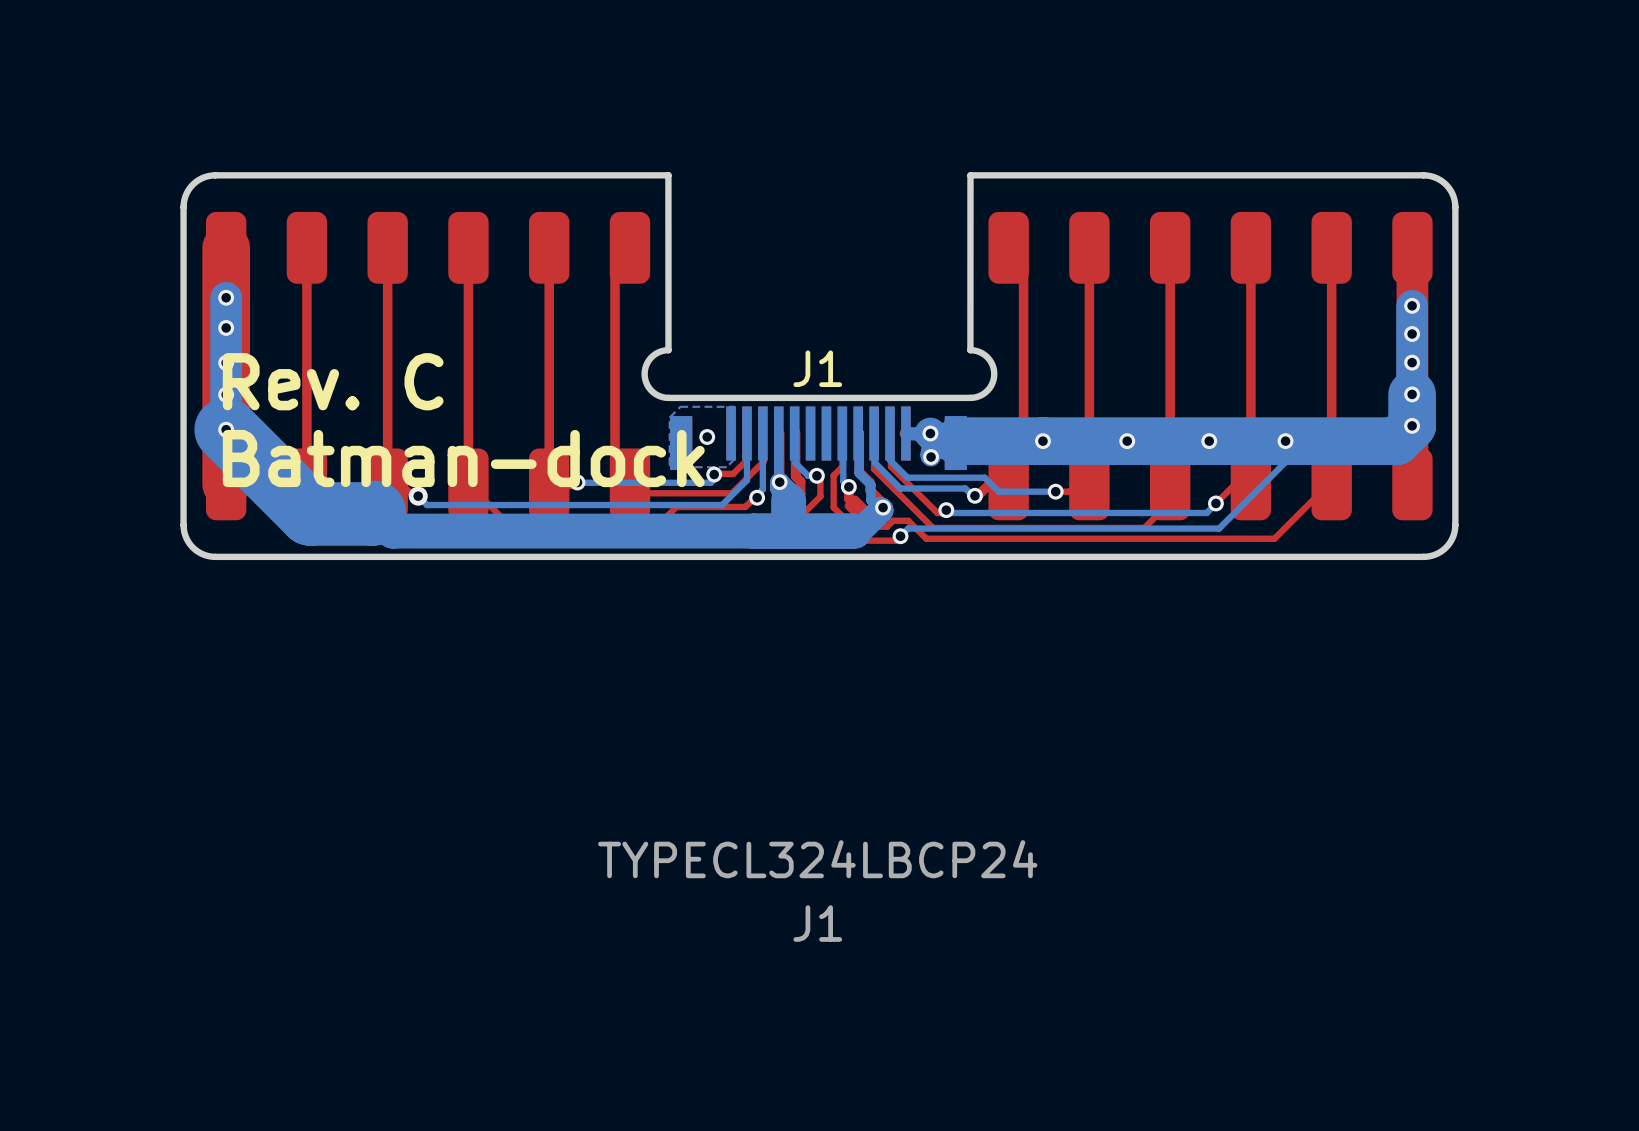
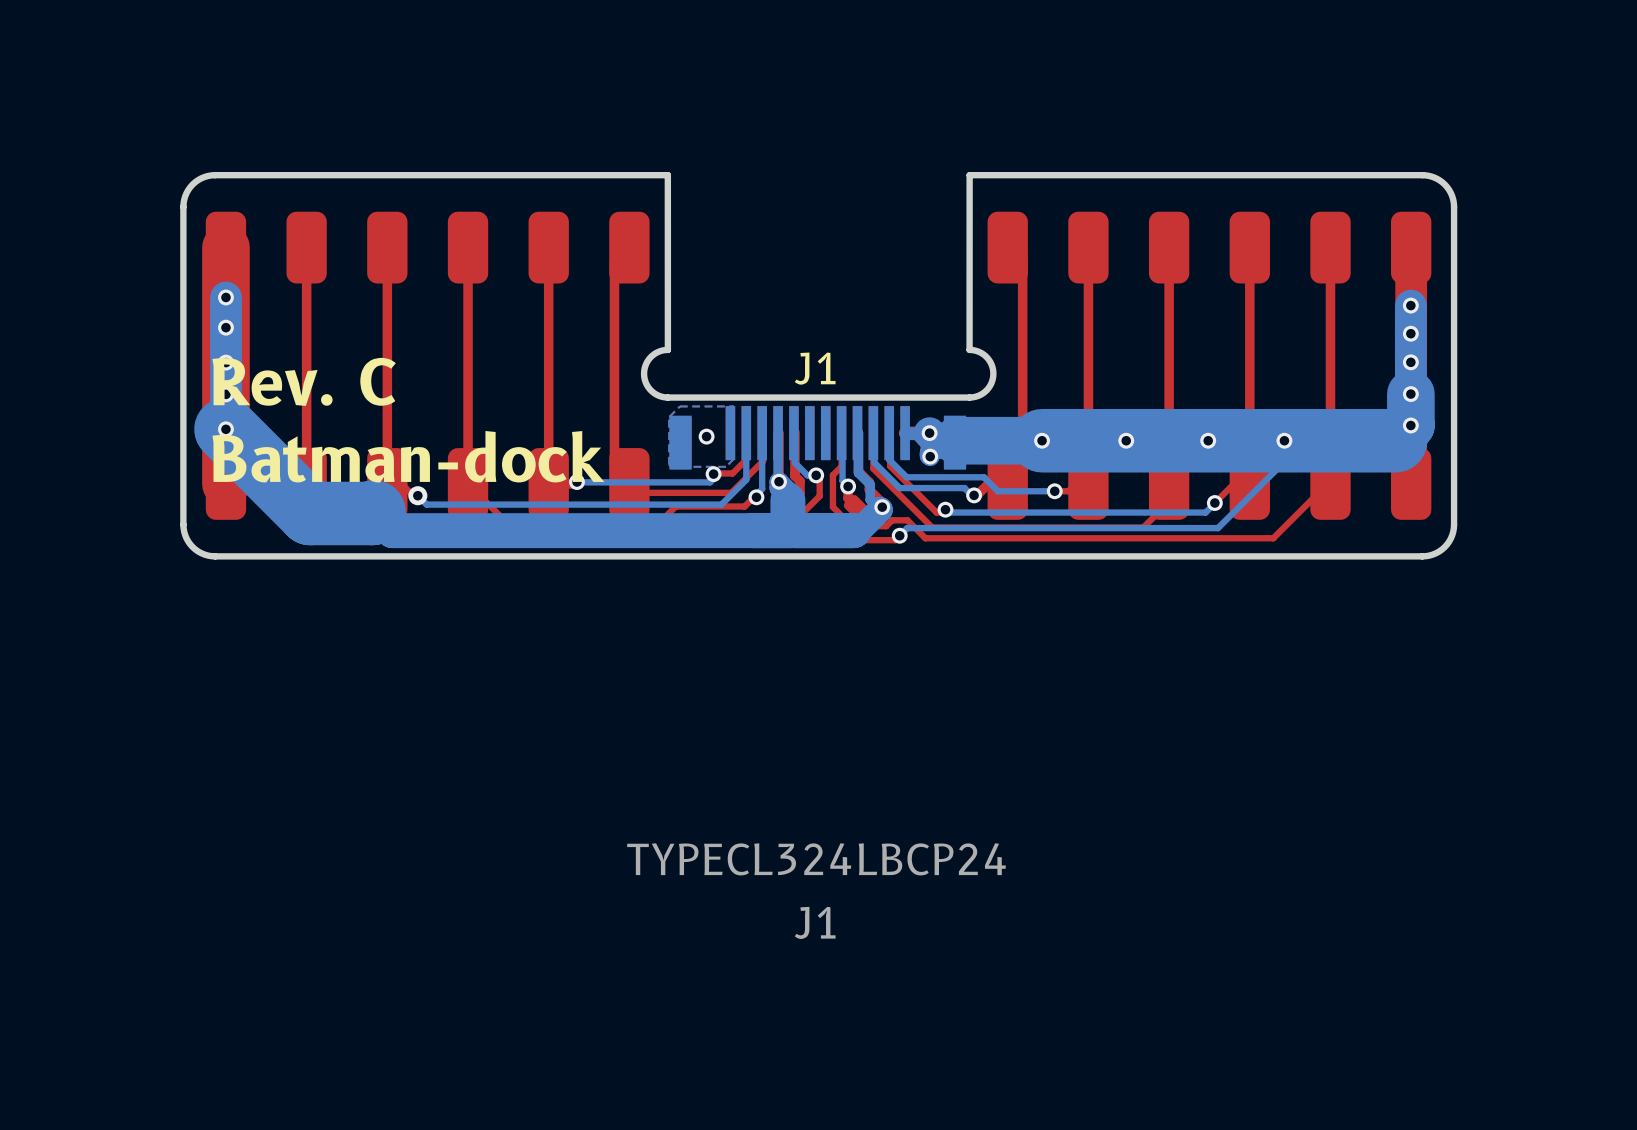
bottom track width: thin (1396, 441) (1042, 441) -> thick (1395, 440) (1042, 440)

